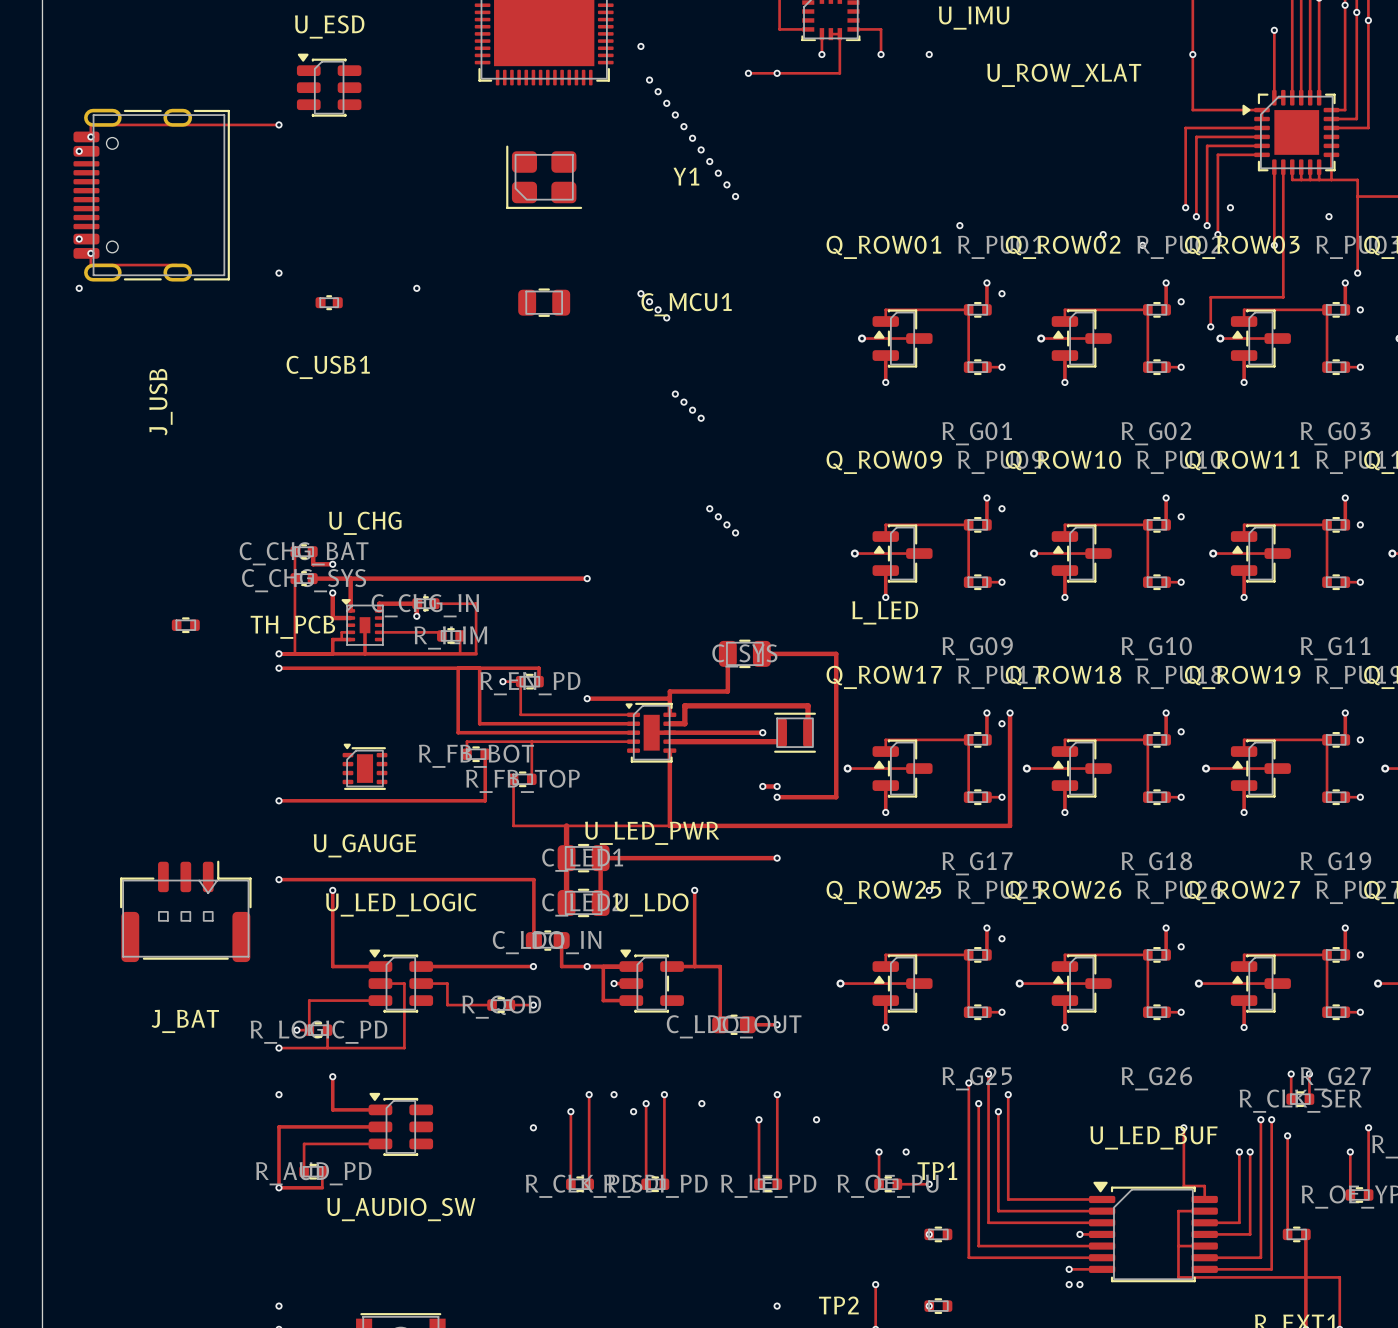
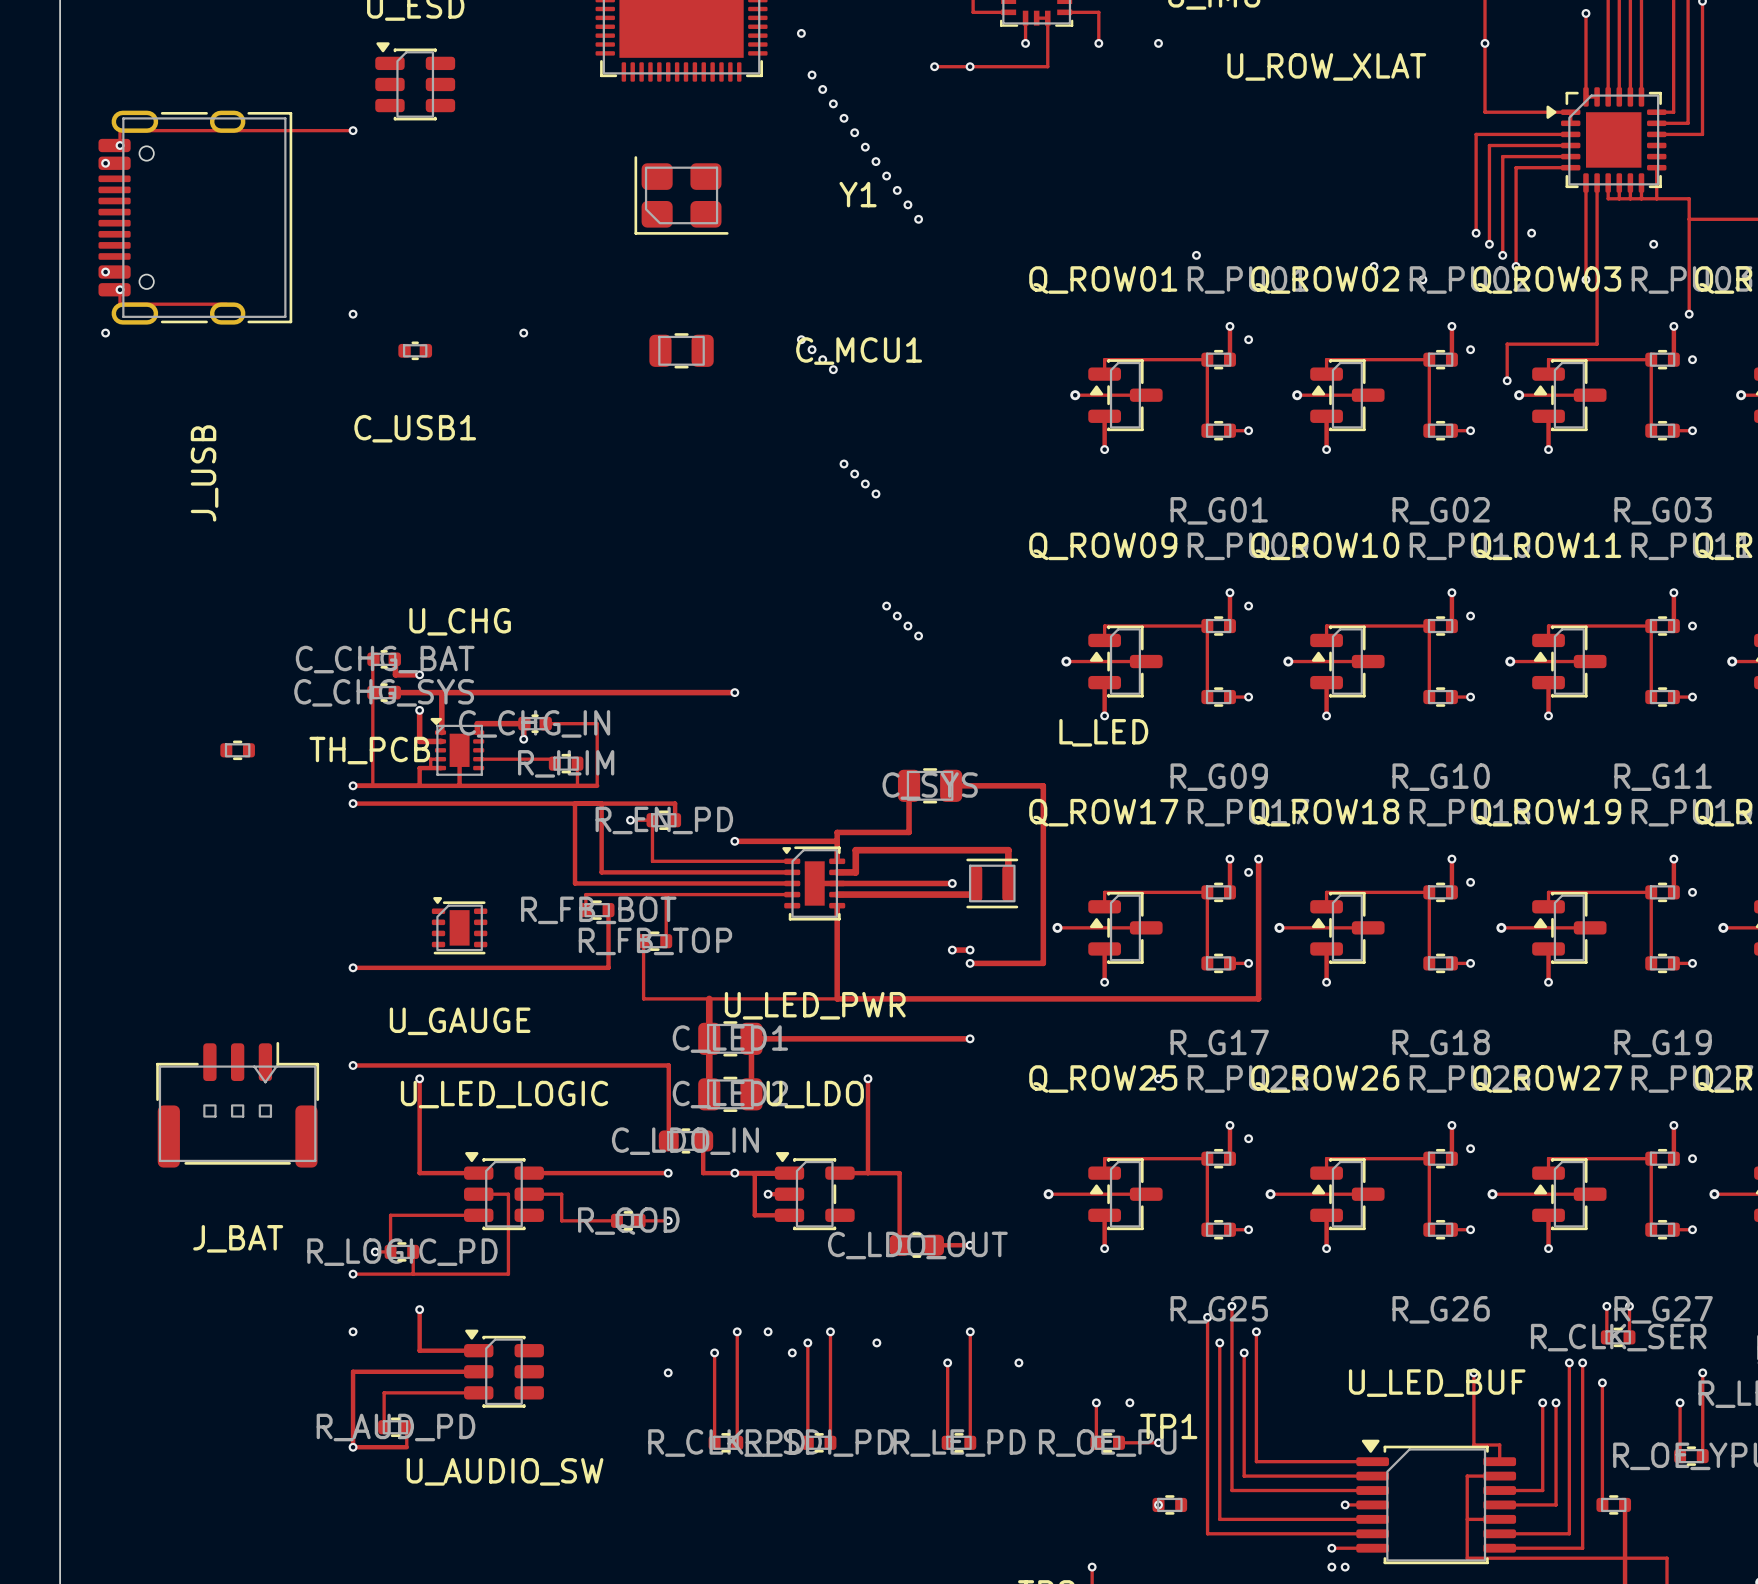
U_CHG footprint: [341, 599, 384, 646] -> [430, 717, 485, 776]

